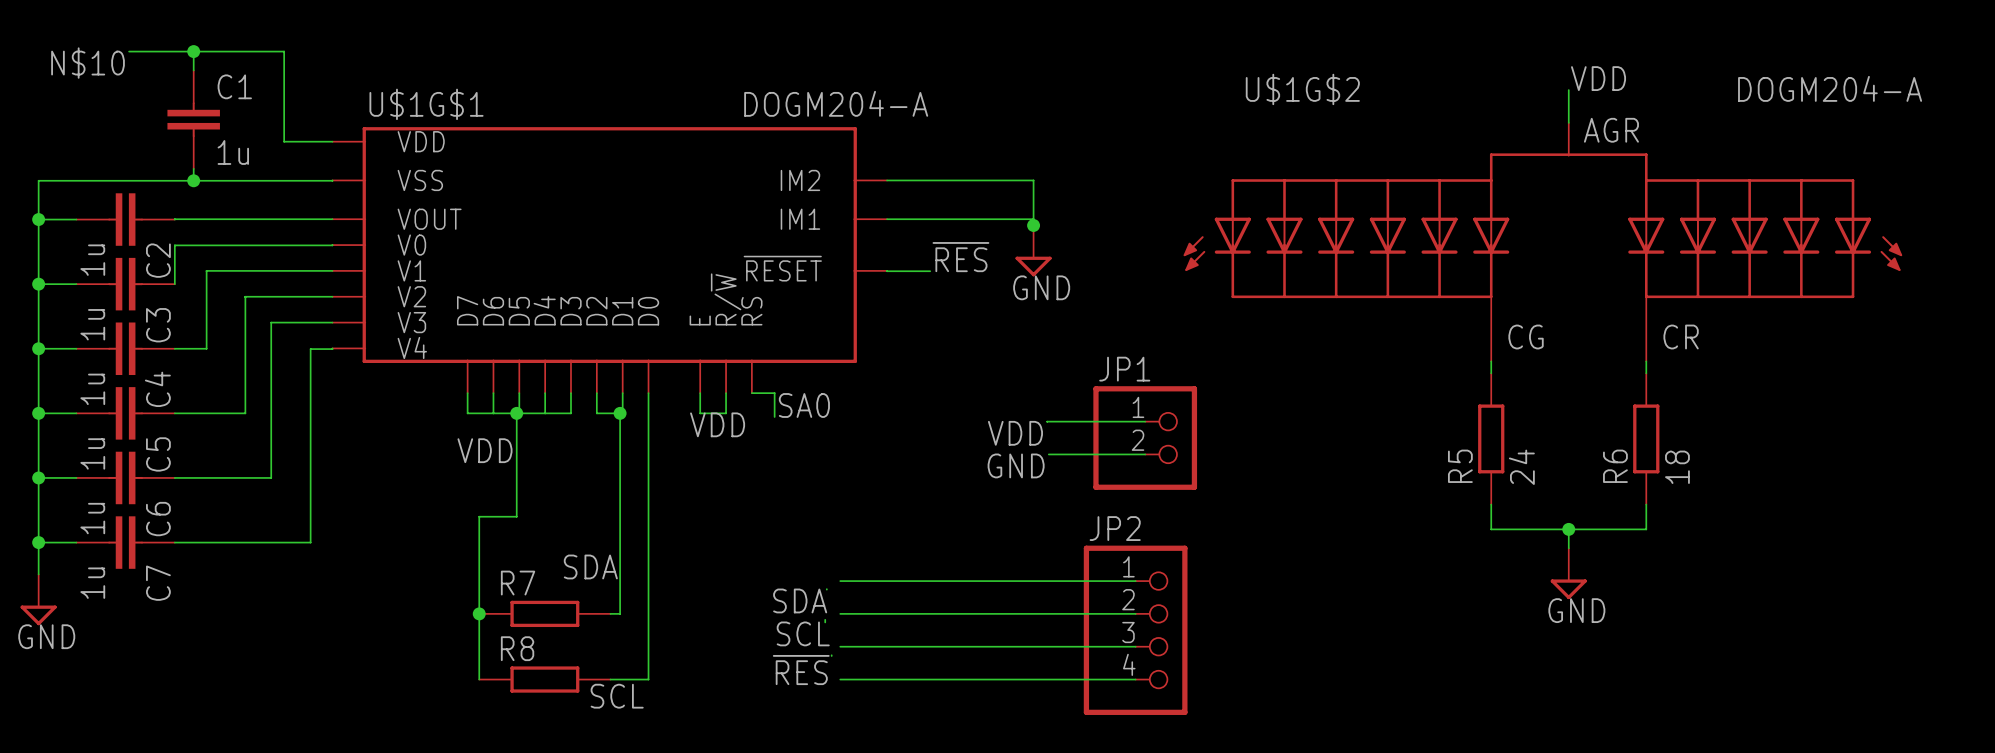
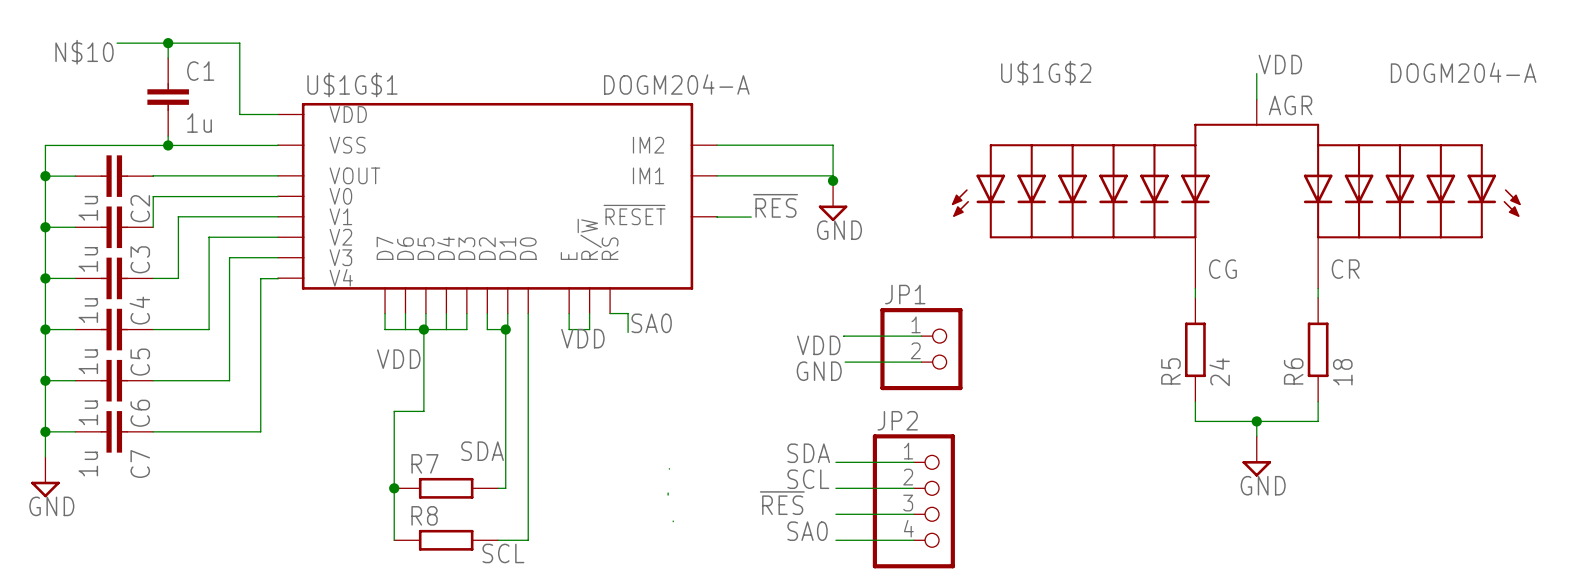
wire: (840, 581) (1037, 581) -> none
label position: SDA (800, 600) -> SDA (808, 453)
wire: (840, 613) (1037, 613) -> none
label position: SCL (803, 633) -> SCL (808, 479)
wire: (840, 646) (1037, 646) -> none
label: none -> SA0 (807, 531)
label position: ~{RES} (801, 670) -> ~{RES} (782, 503)
wire: (840, 679) (1037, 679) -> none

